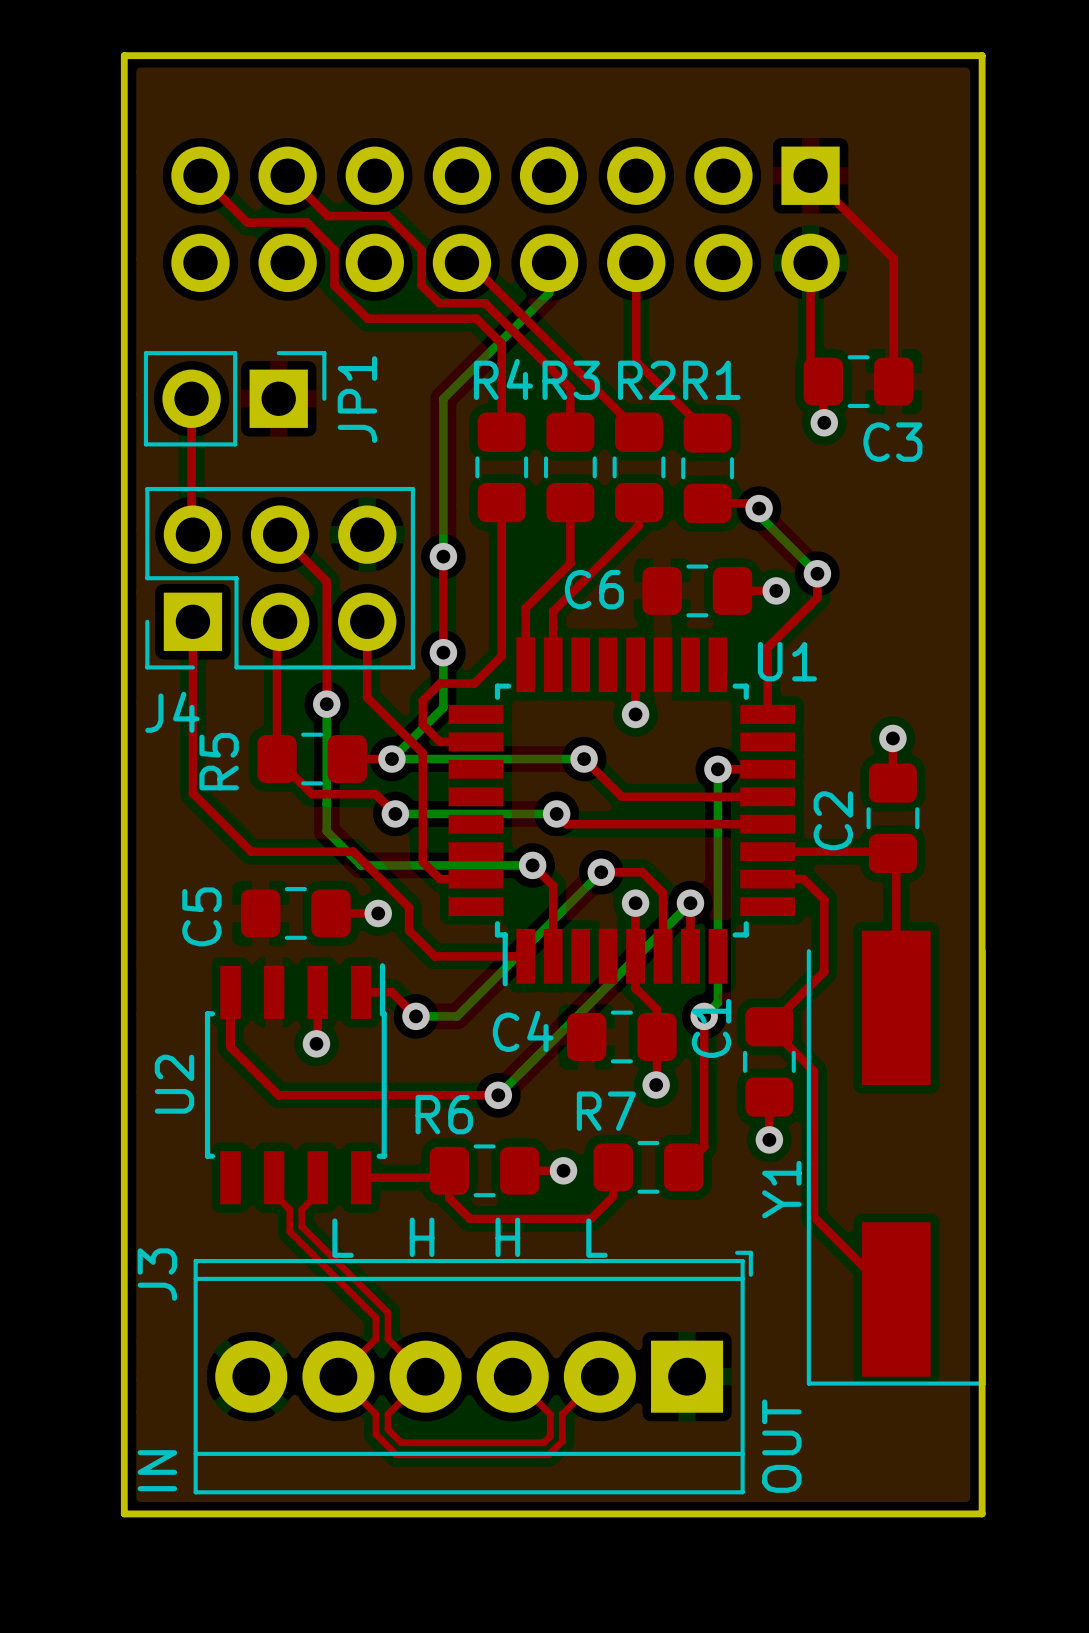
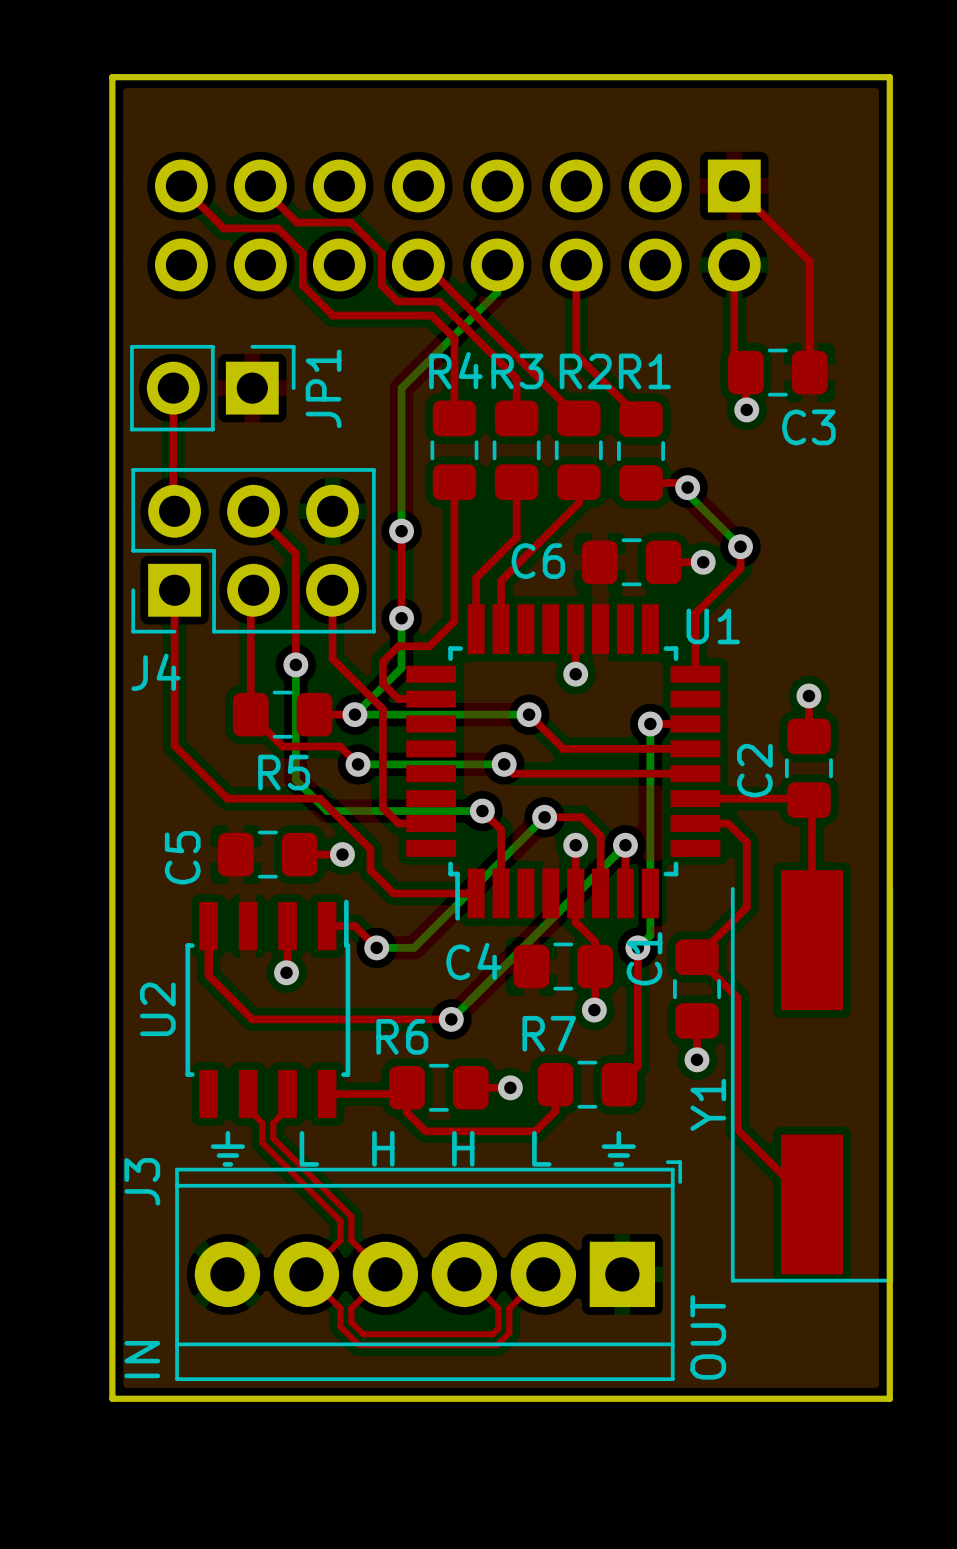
R5 name rotation: 0° (219, 761) -> 90° clockwise (284, 772)
R5 name position: R5 (219, 761) -> R5 (284, 772)
text: H (422, 1237) -> ⏚ L H H L ⏚ (423, 1148)
text: H (507, 1237) -> none
text: L (343, 1238) -> none
text: L (596, 1238) -> none

